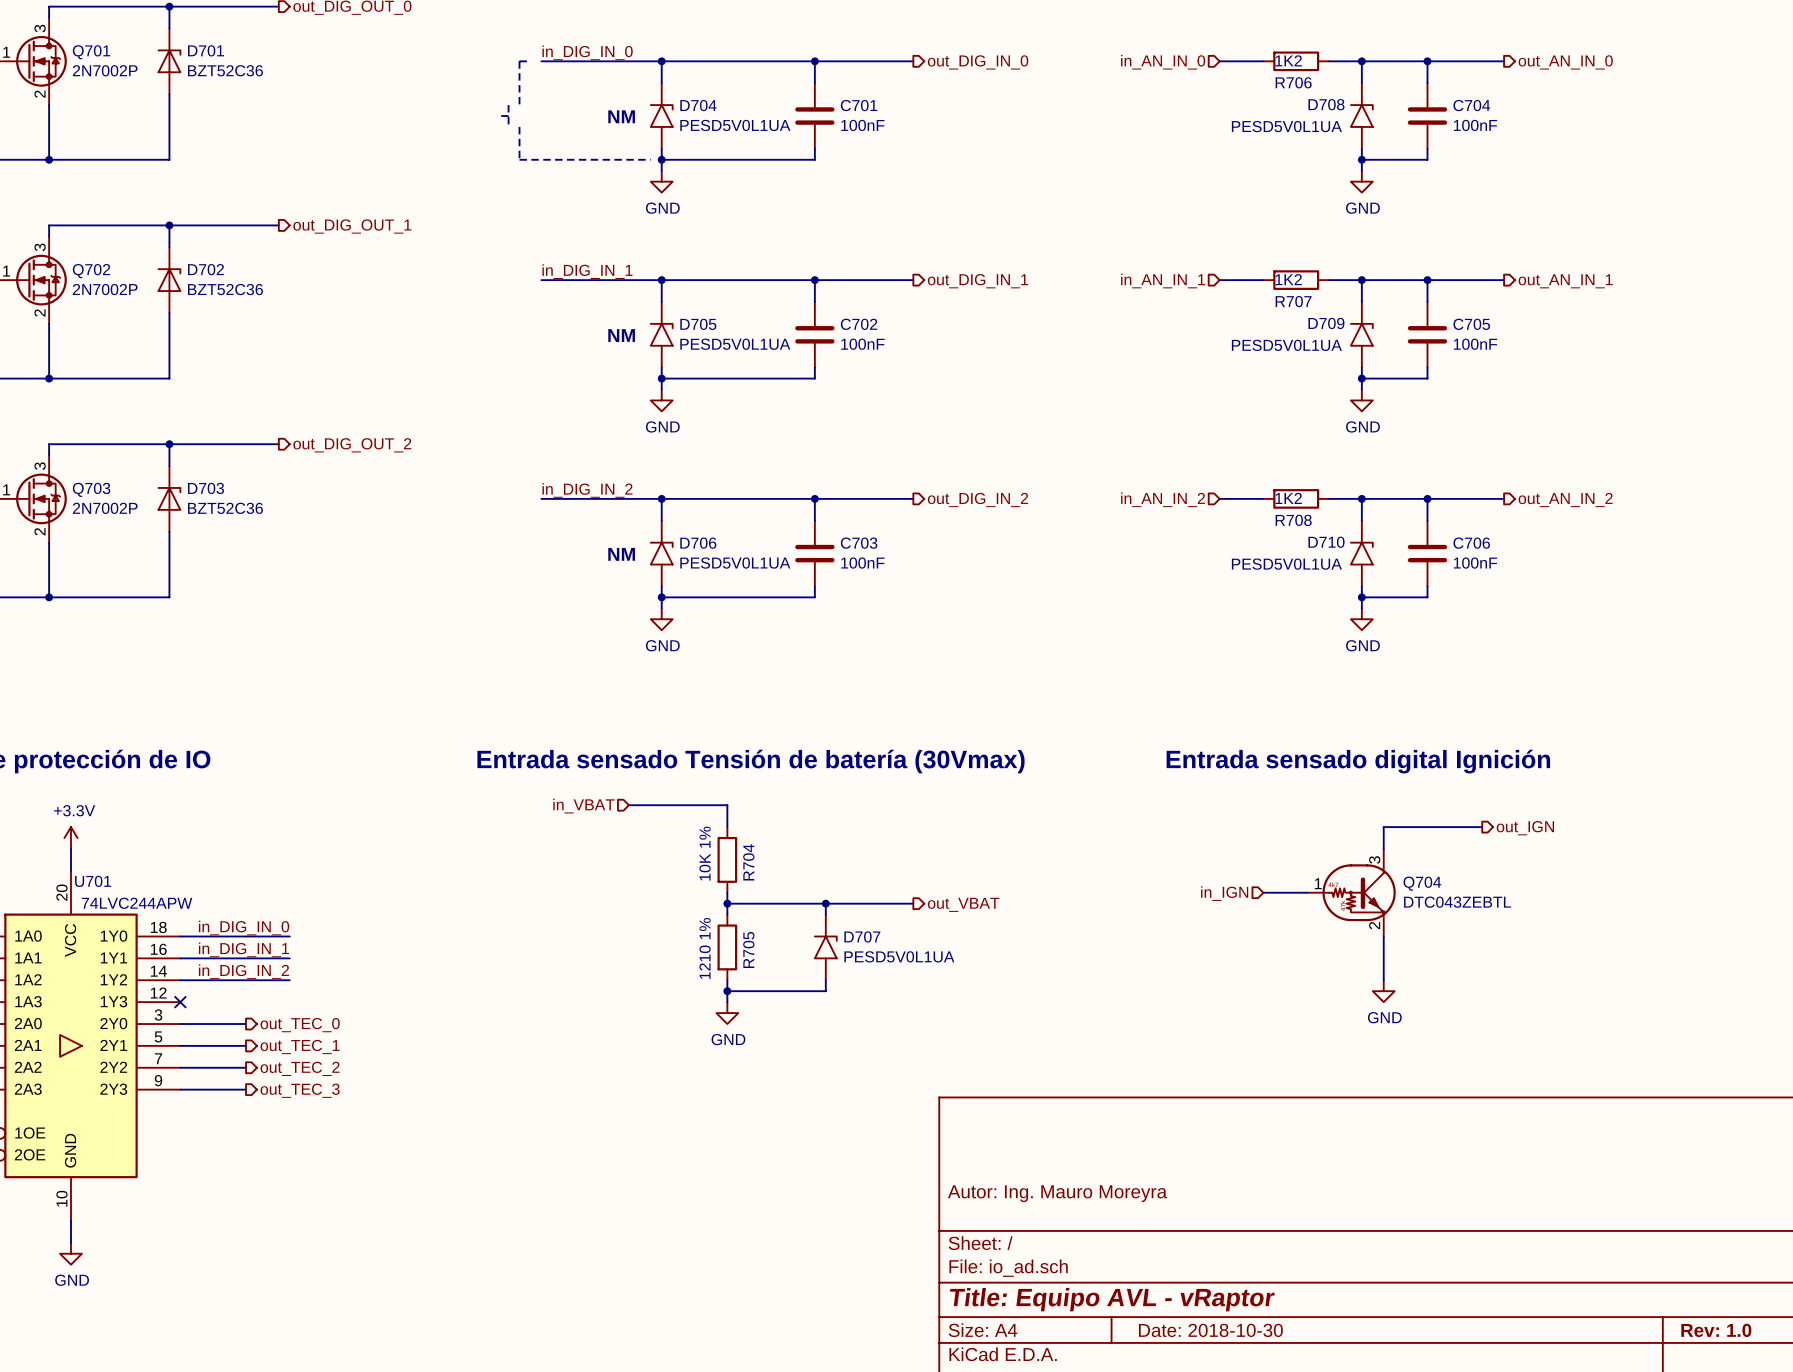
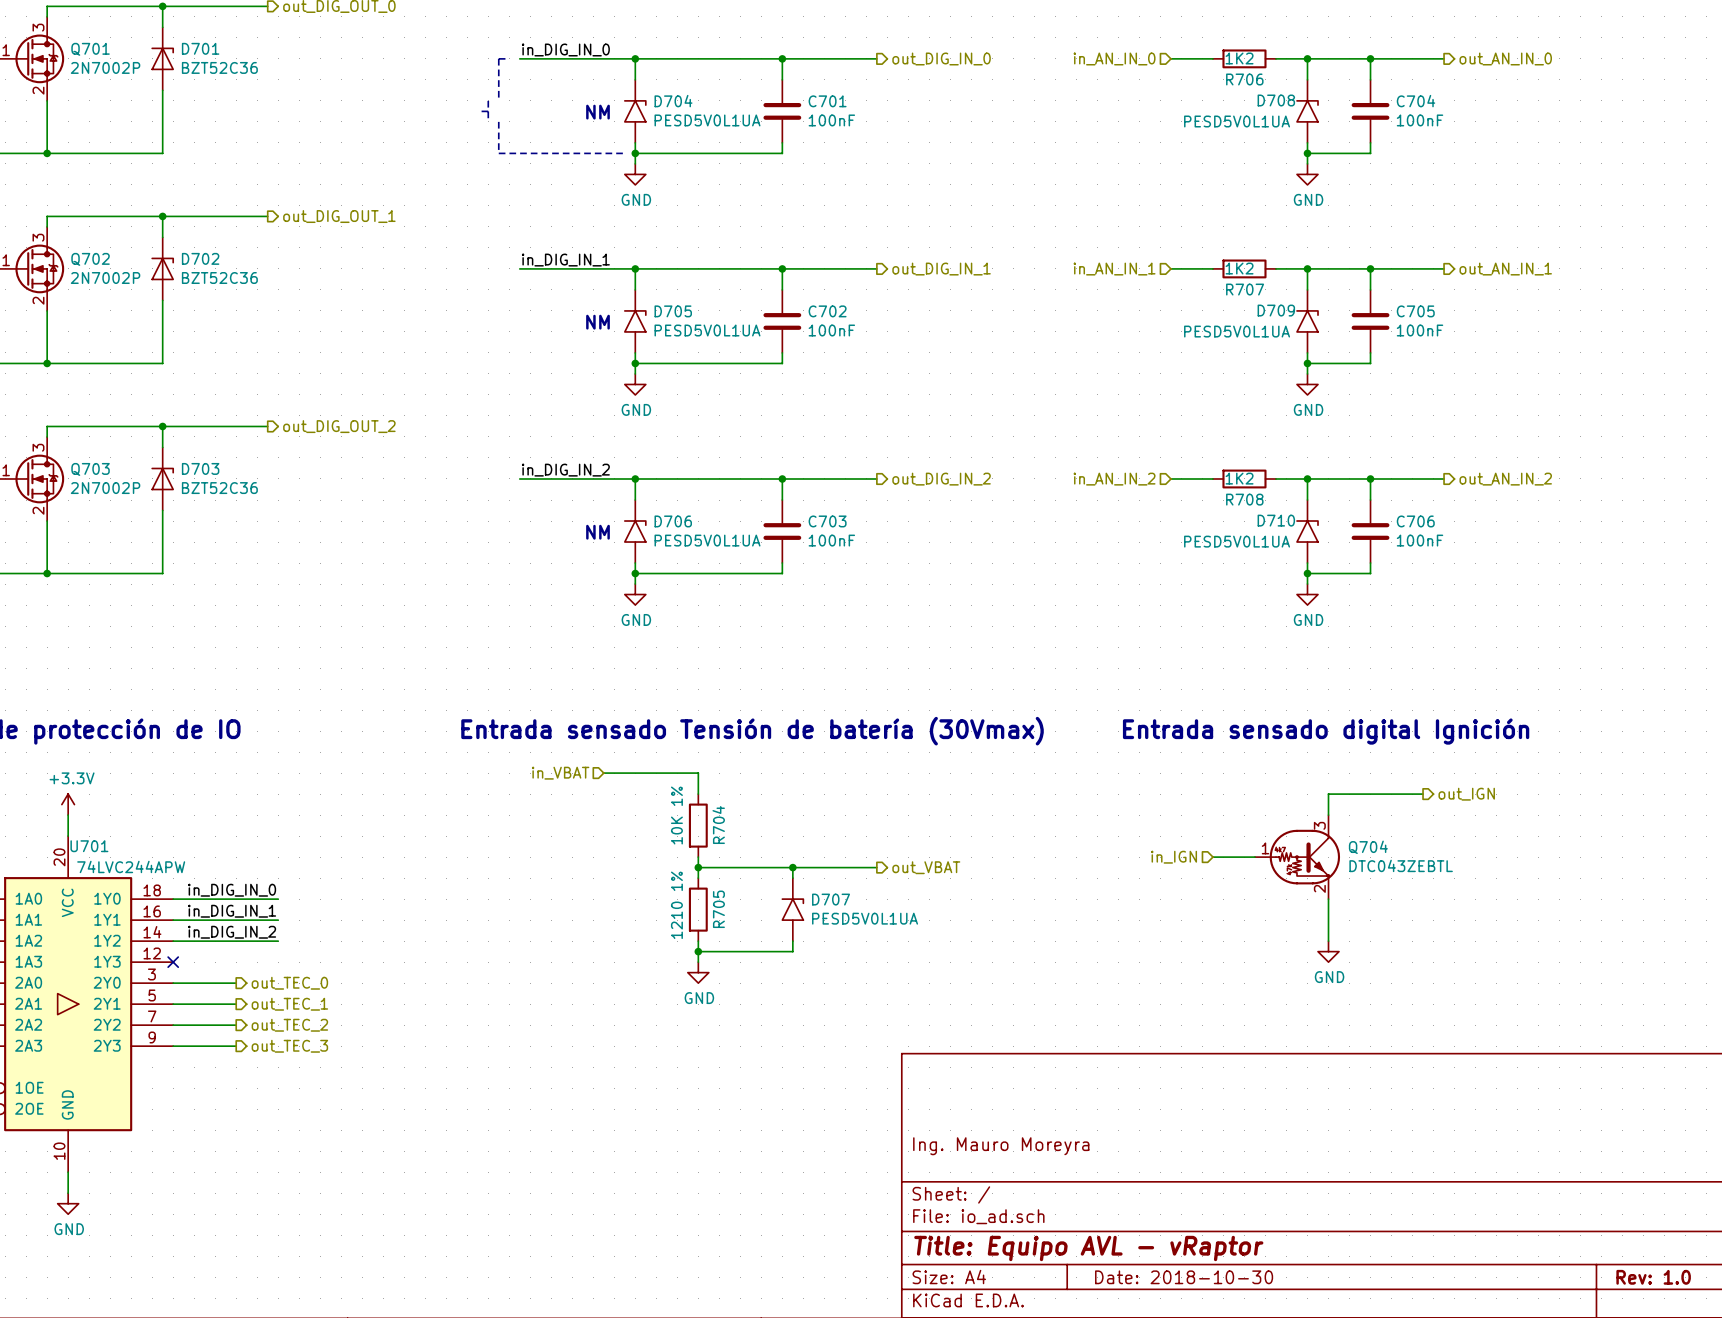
title block: Autor: Ing. Mauro Moreyra (1057, 1193) -> Ing. Mauro Moreyra (1001, 1146)

